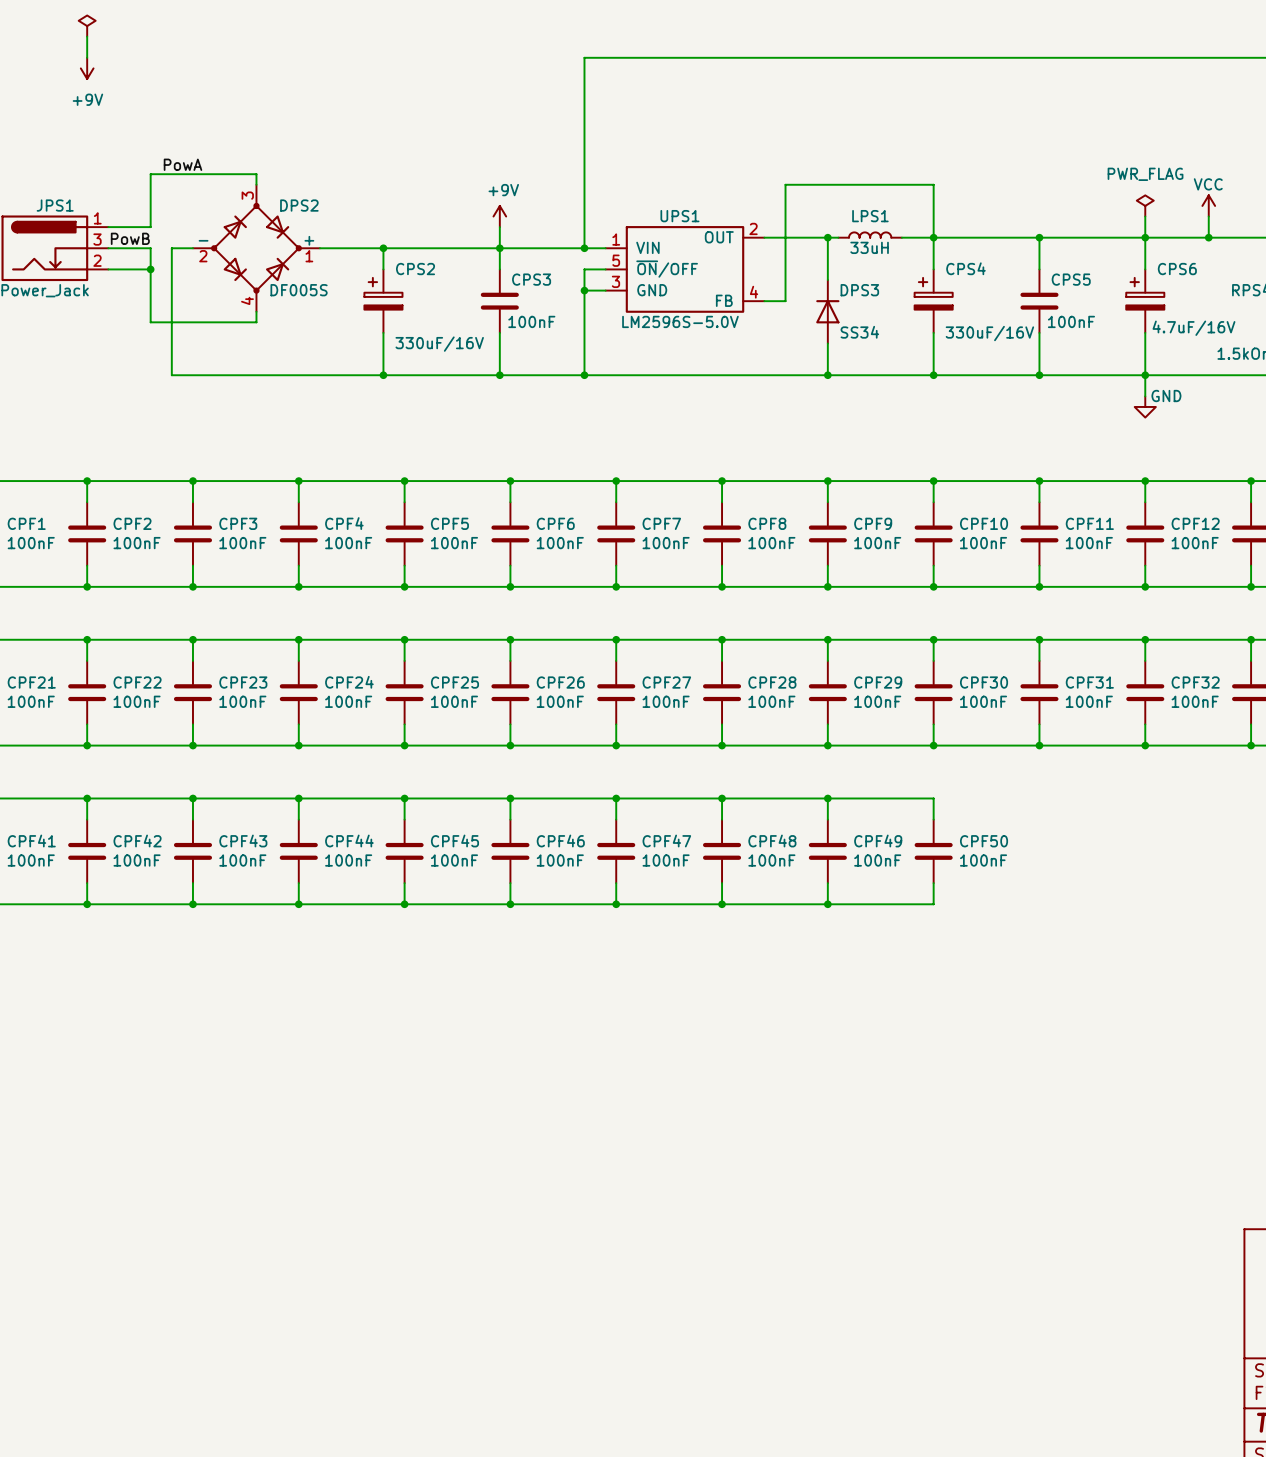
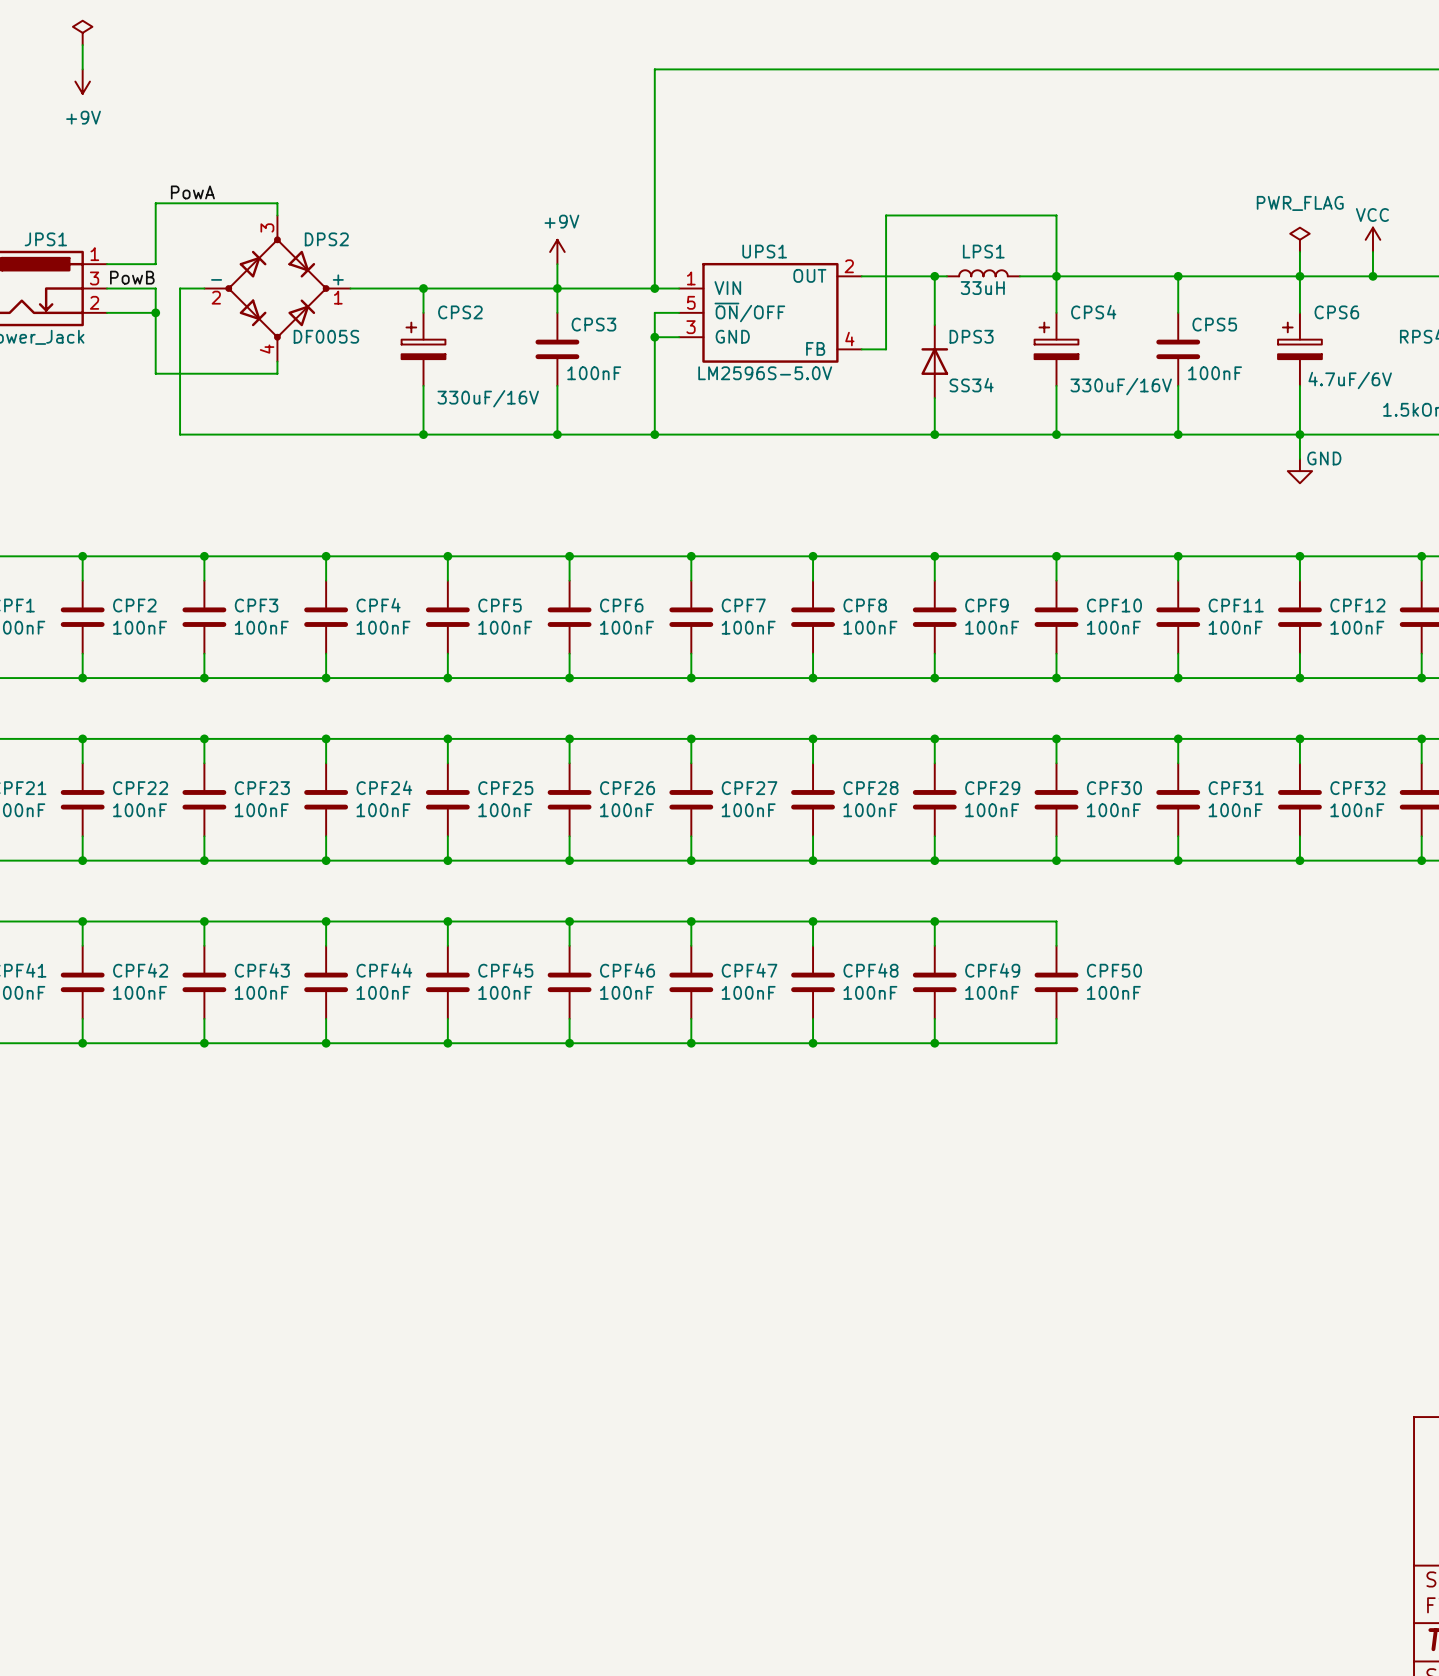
CPS6 value: 4.7uF/16V (1193, 328) -> 4.7uF/6V (1350, 380)

